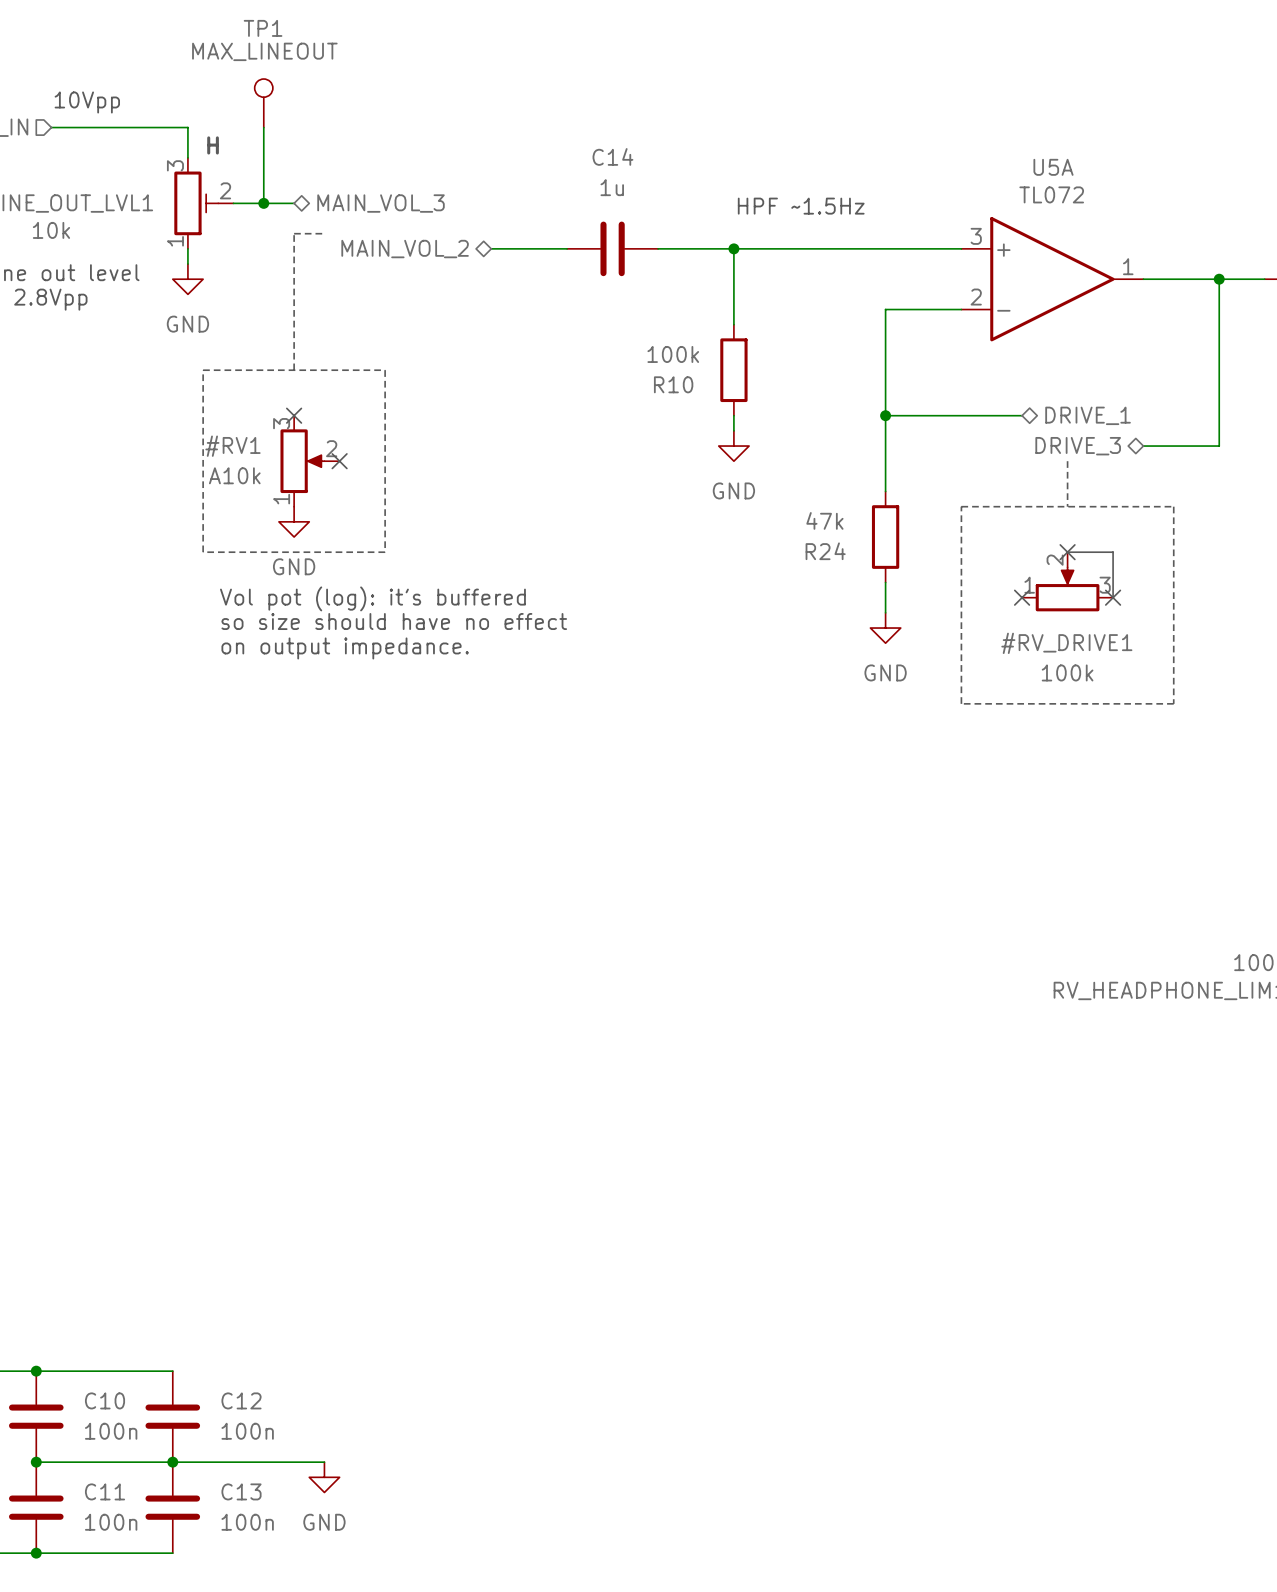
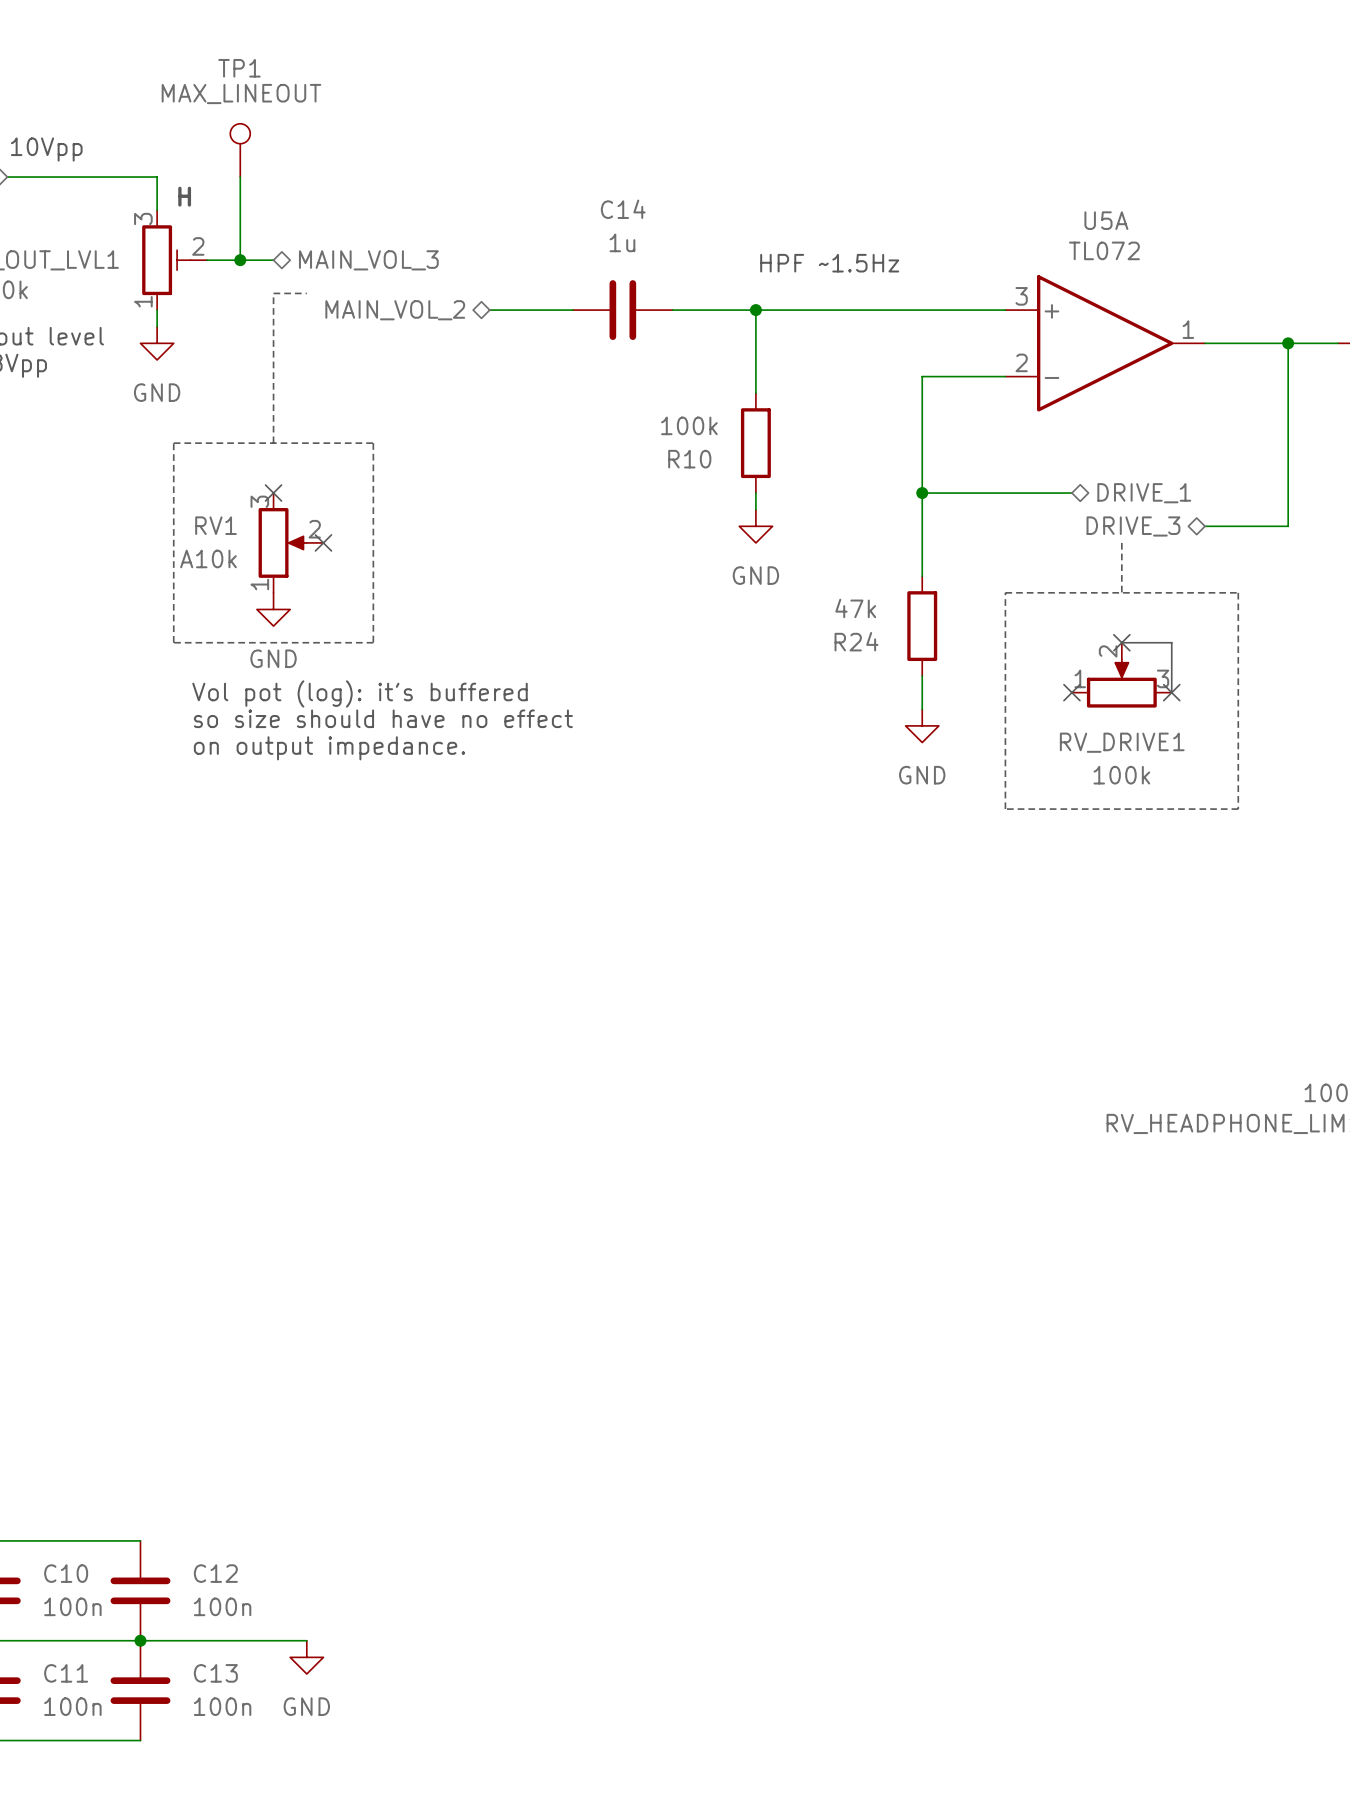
#RV1: A10k (310, 461) -> none
#RV_DRIVE1: 100k (1067, 581) -> none
RV_DRIVE1: none -> 100k (1121, 675)

